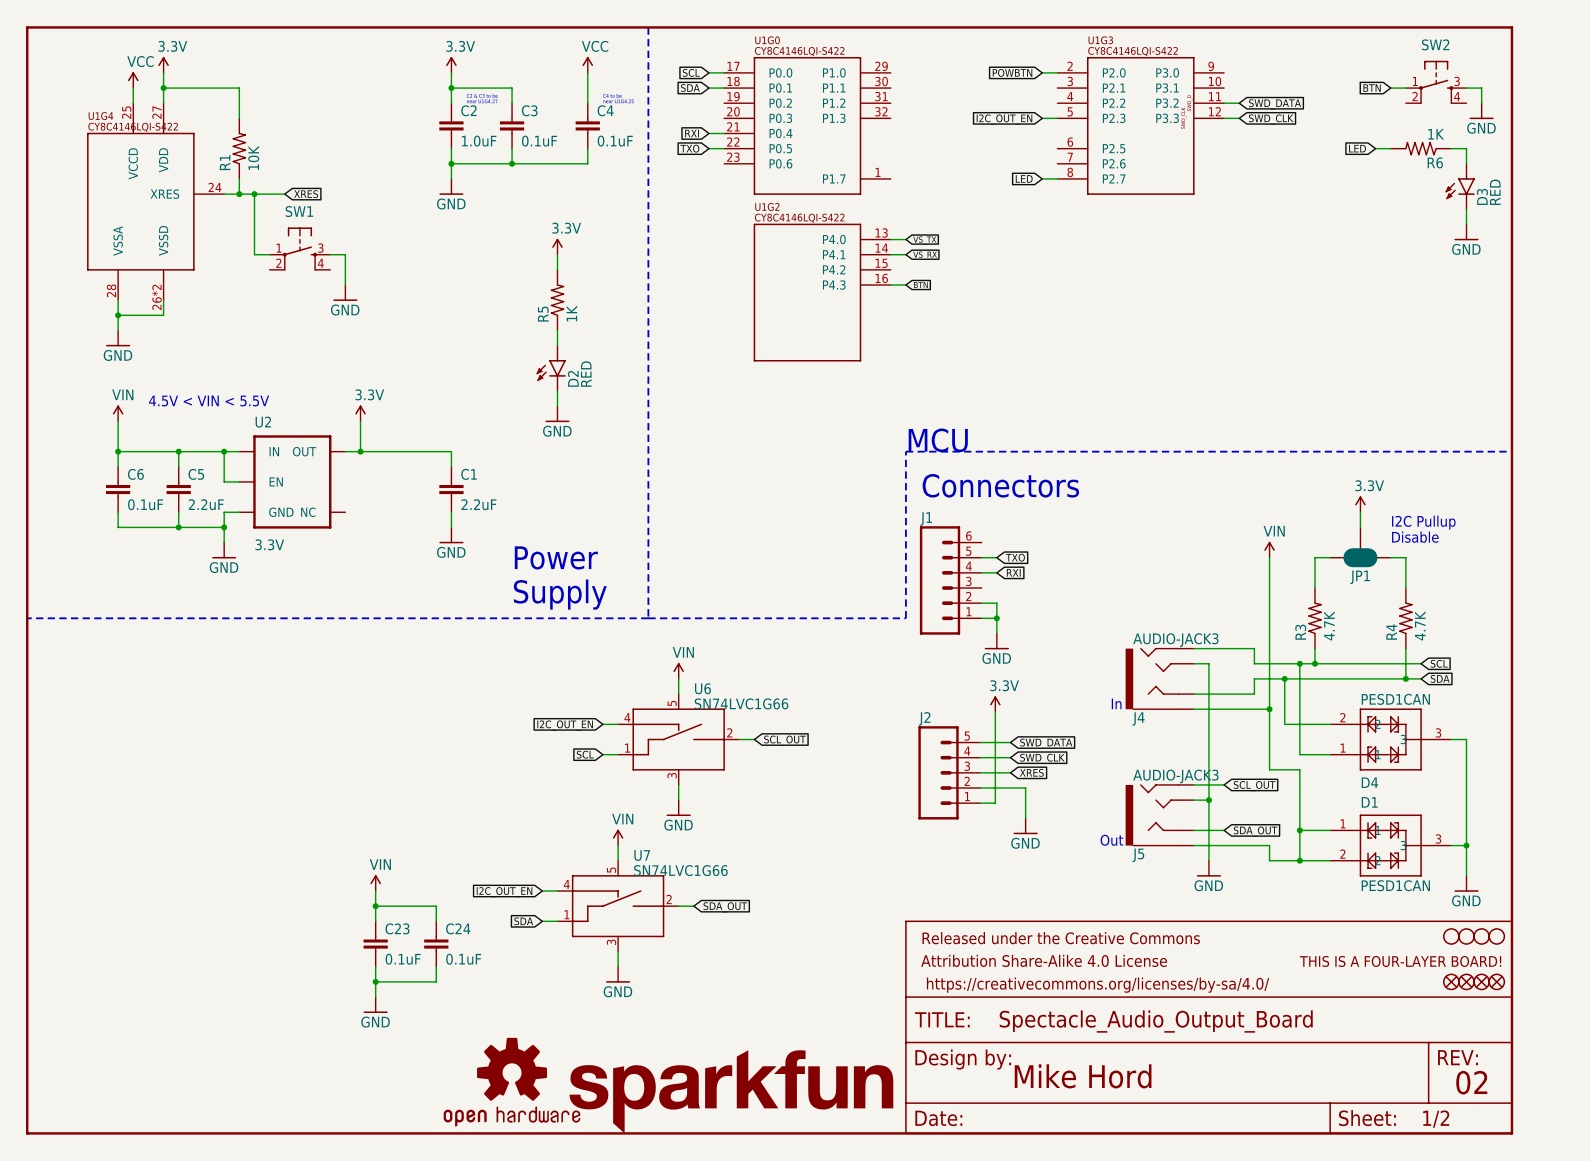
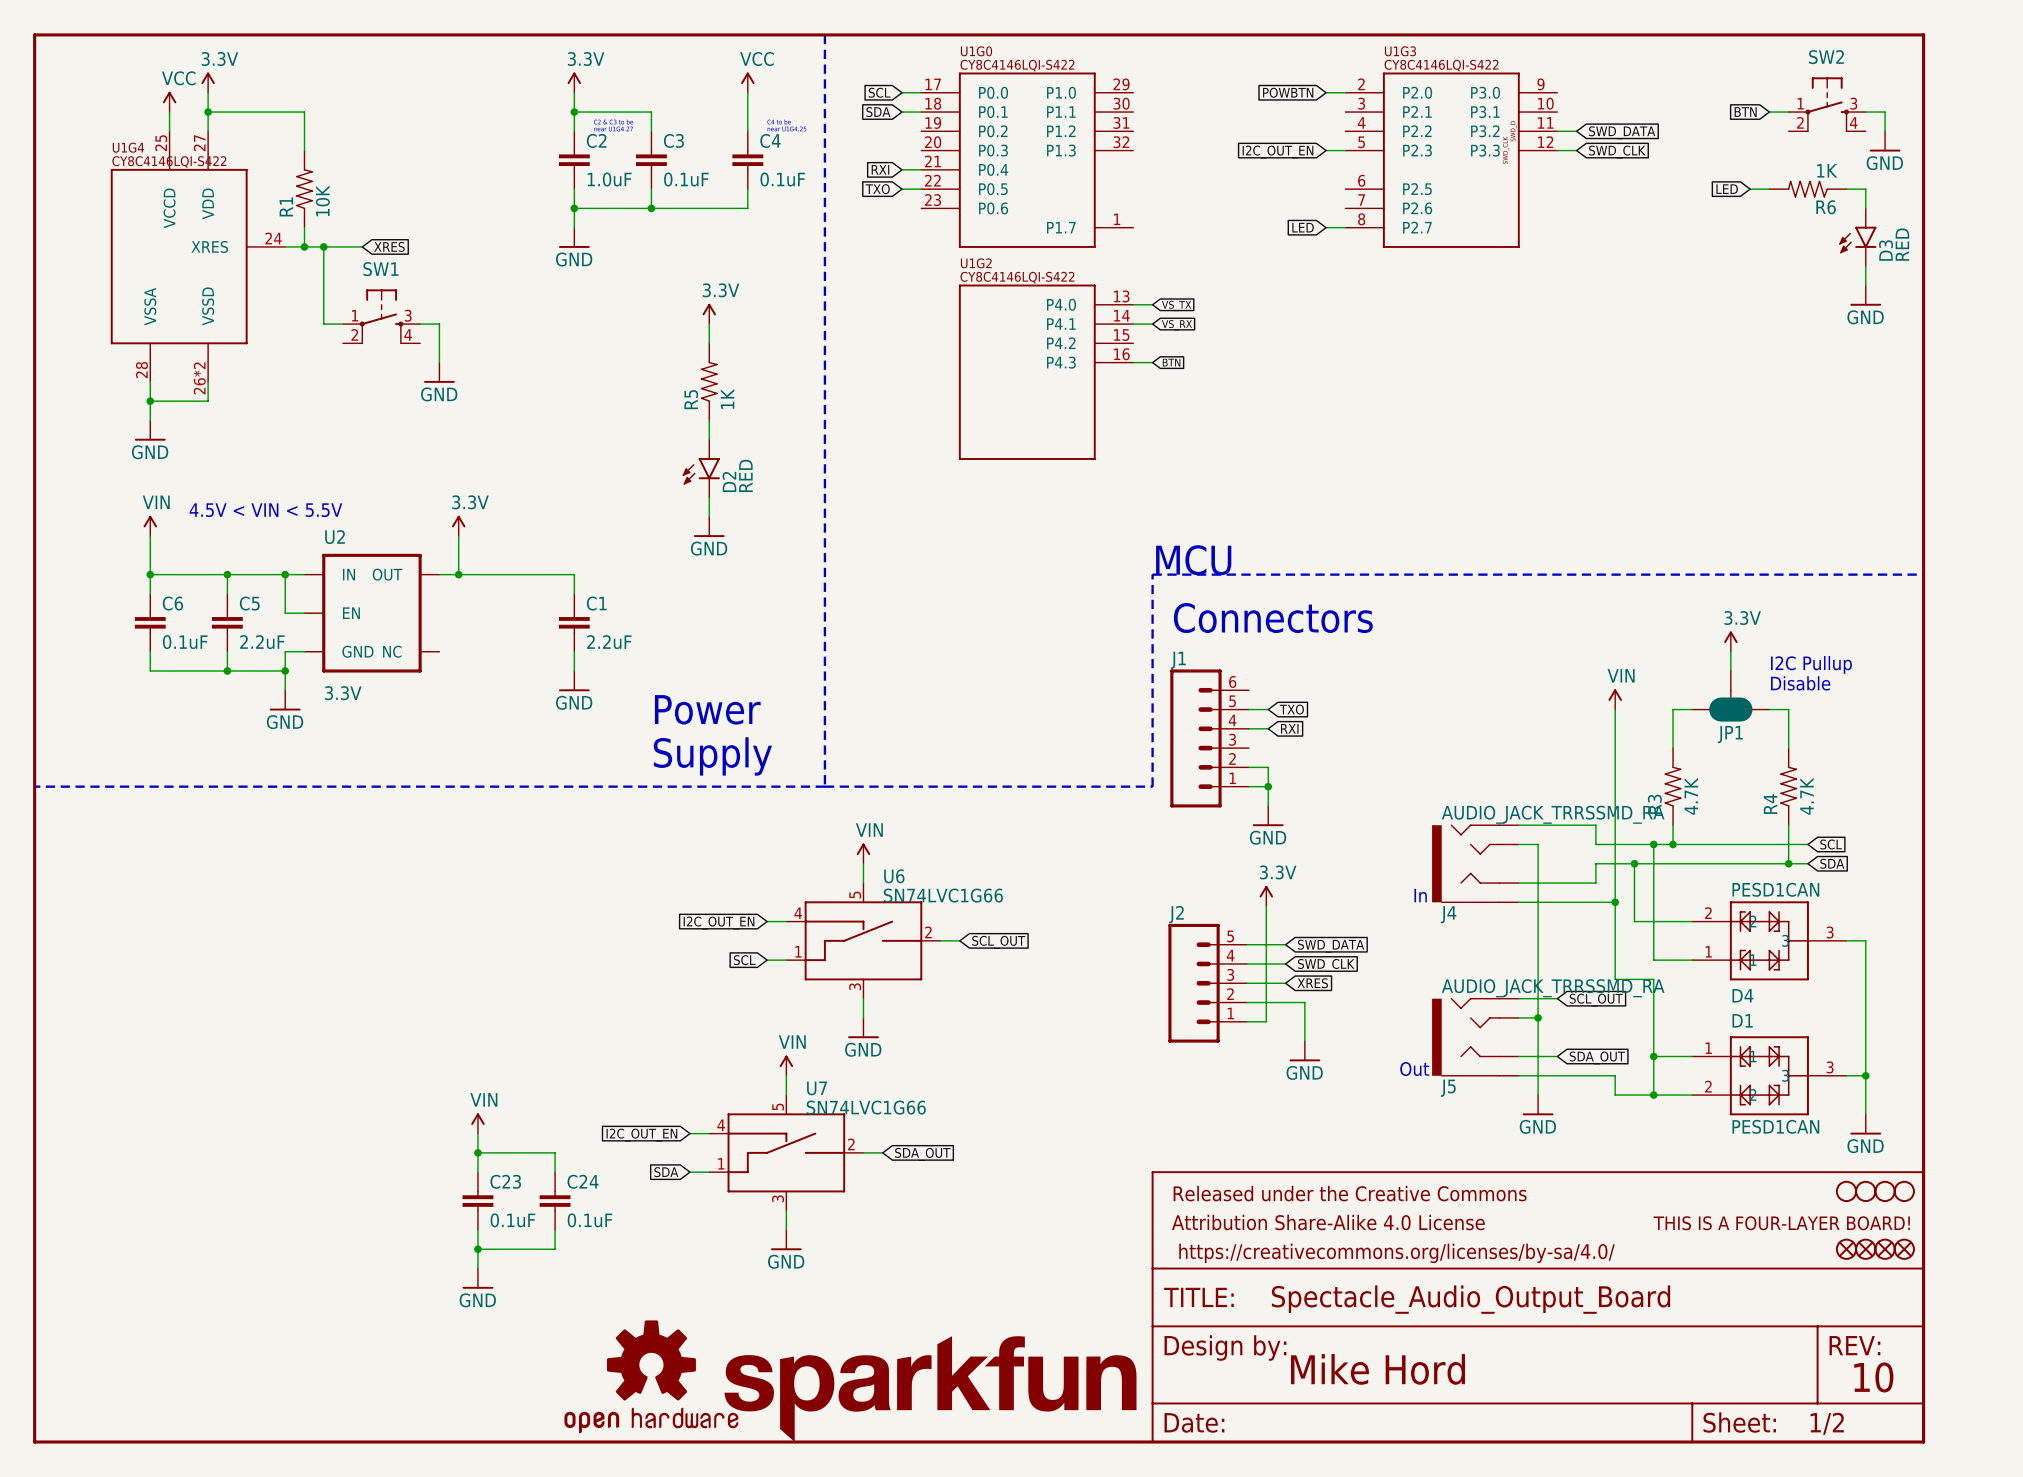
J4 value: AUDIO-JACK3 (1175, 640) -> AUDIO_JACK_TRRSSMD_RA (1553, 814)
J5 value: AUDIO-JACK3 (1175, 776) -> AUDIO_JACK_TRRSSMD_RA (1553, 988)
text: 02 (1471, 1082) -> 10 (1873, 1377)

